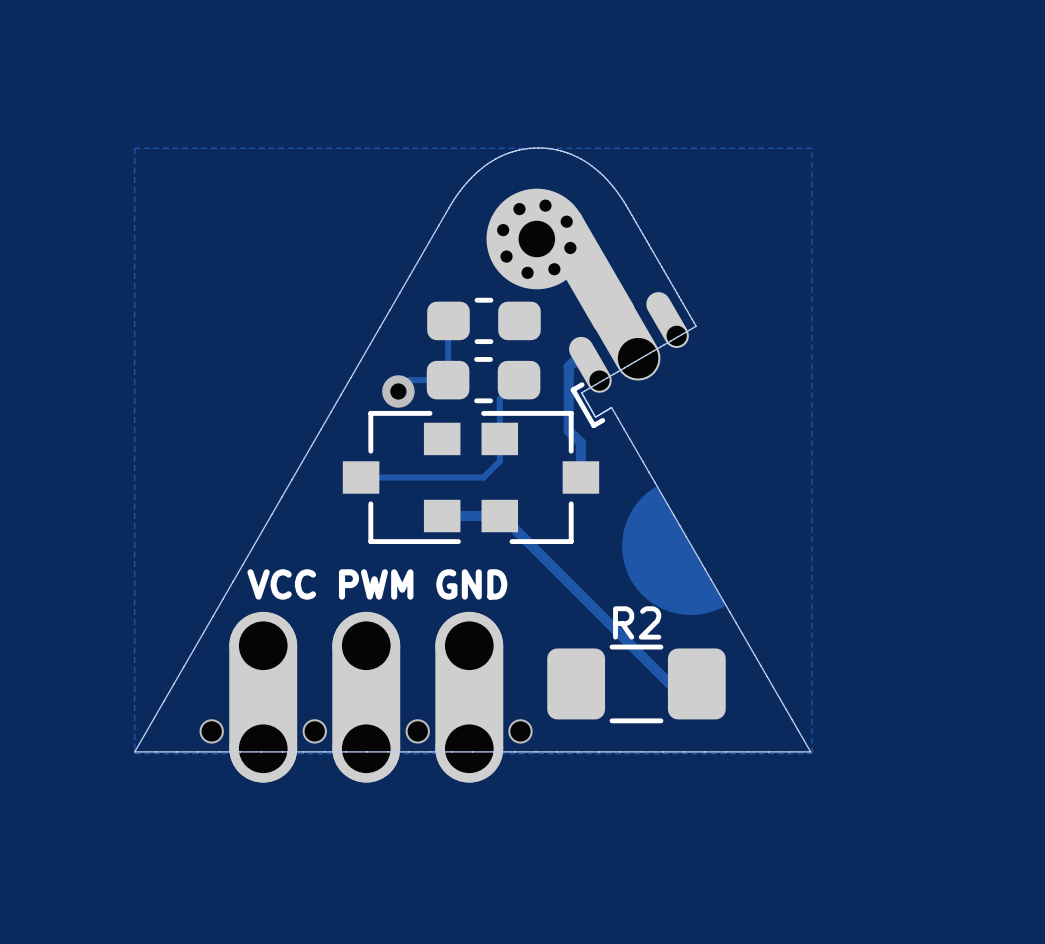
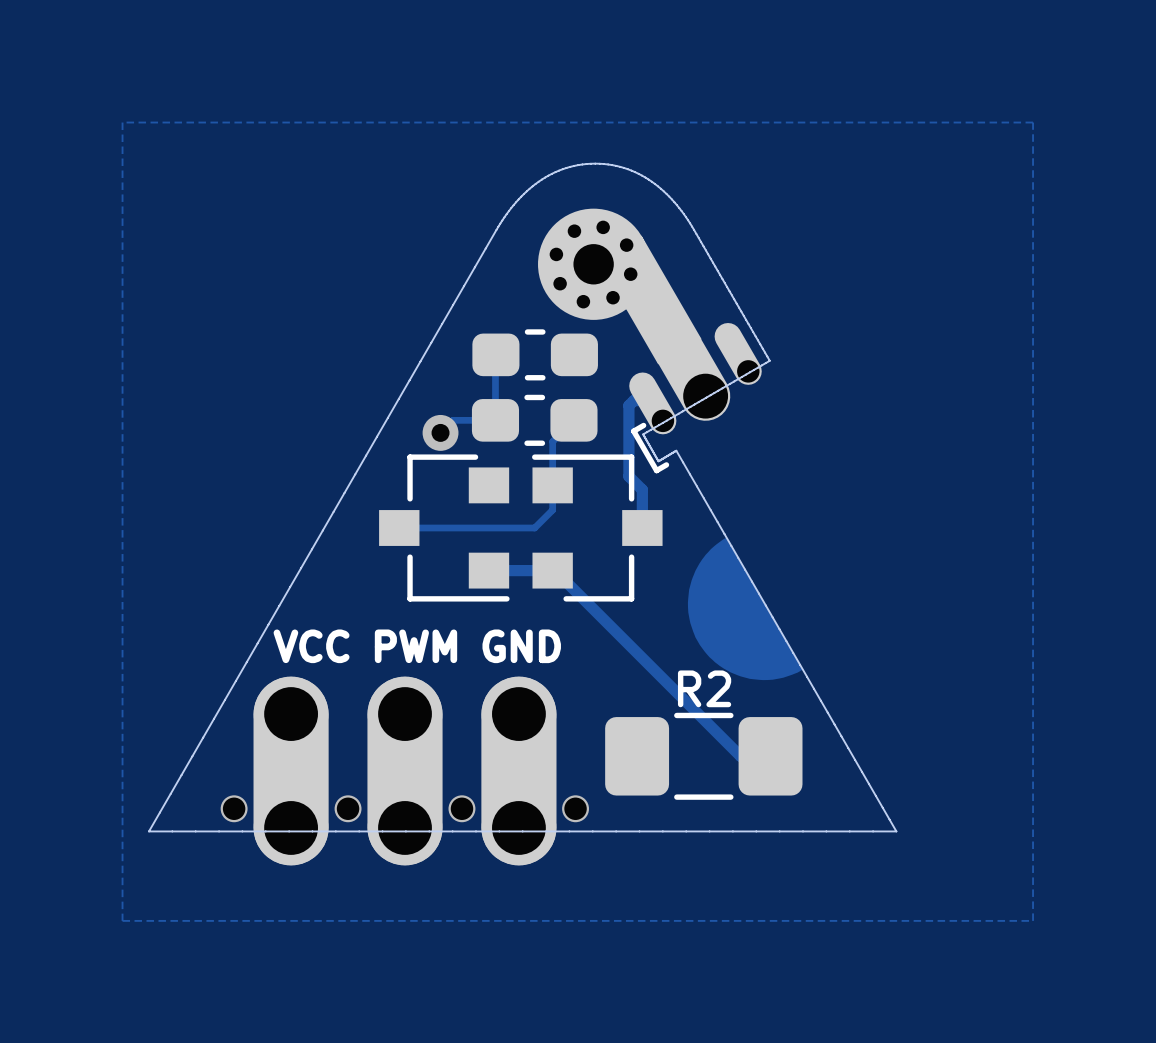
zone outline: (134, 148) (812, 148) (812, 753) (134, 753) (134, 148) -> (122, 122) (122, 920) (1033, 920) (1033, 122) (122, 122)

